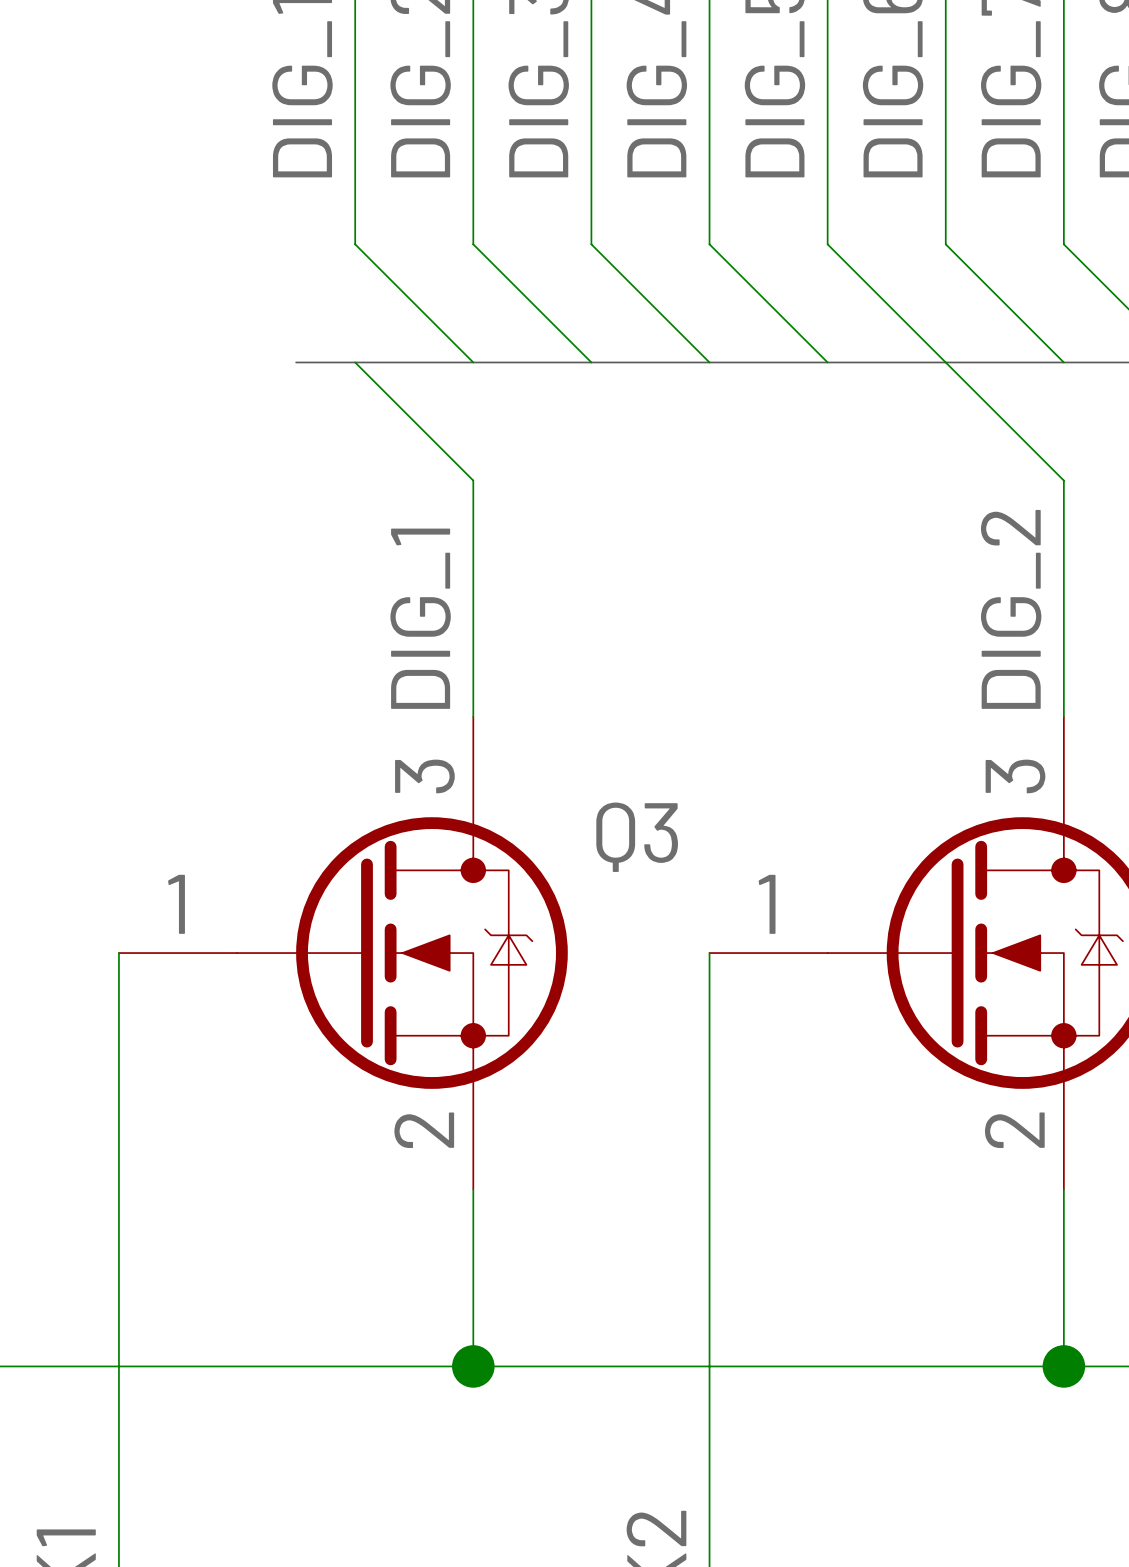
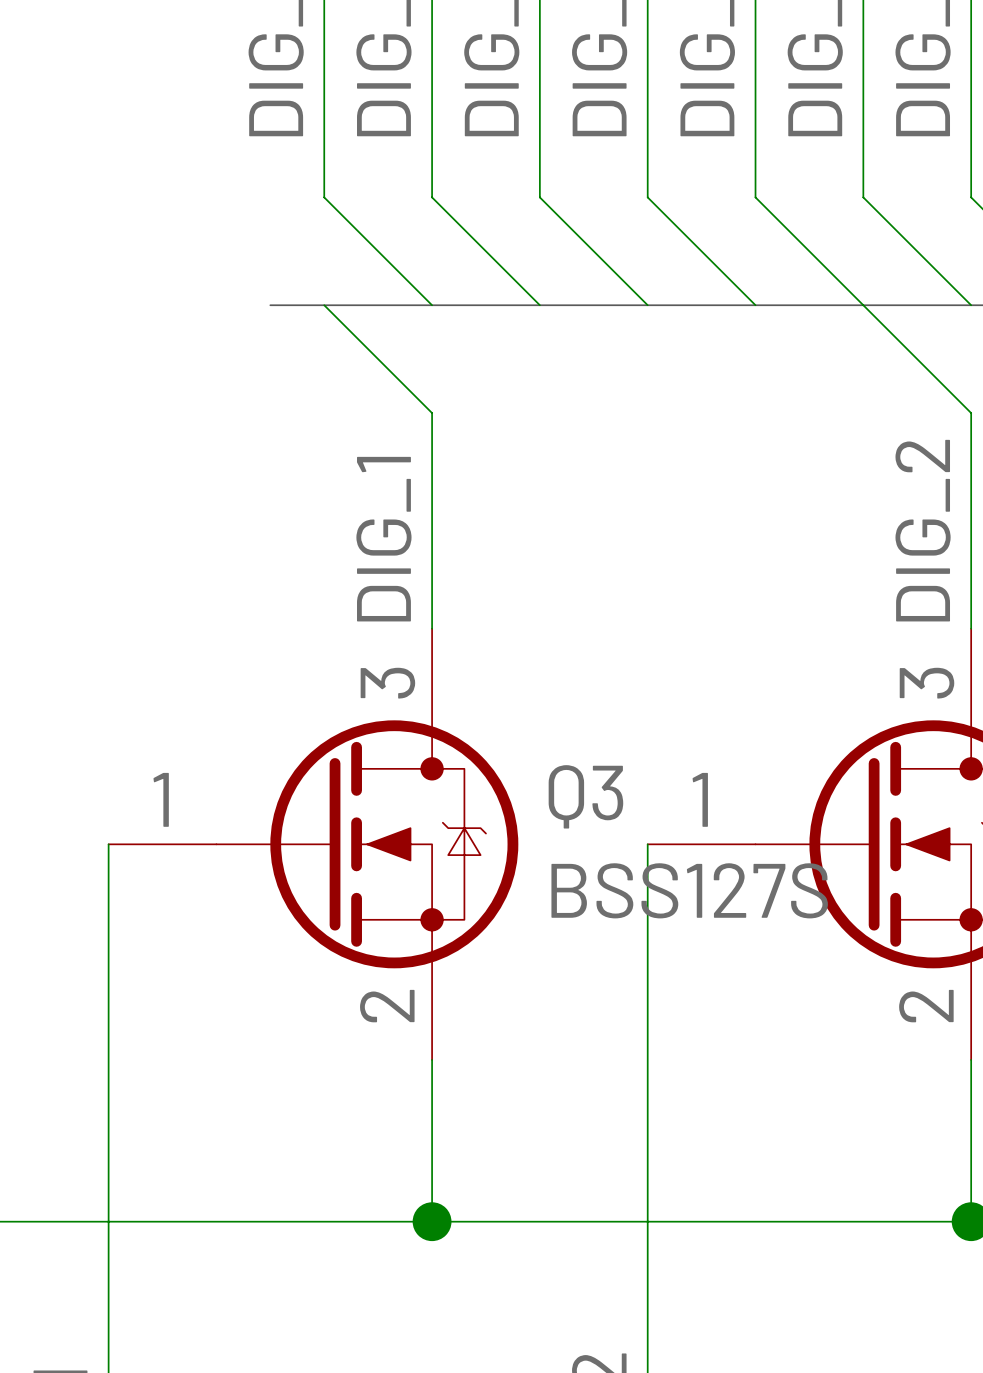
Q3 name position: Q3 (637, 837) -> Q3 (585, 796)
Q3 value: none -> BSS127S (689, 890)

